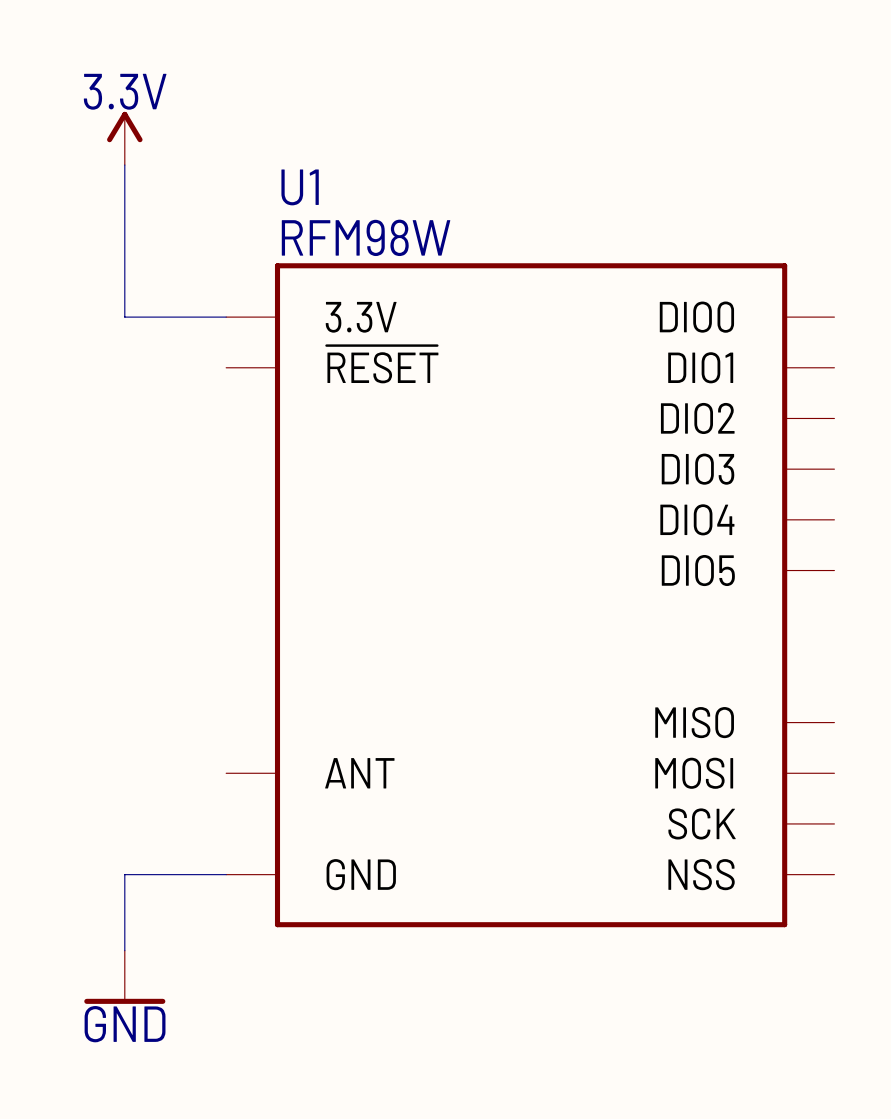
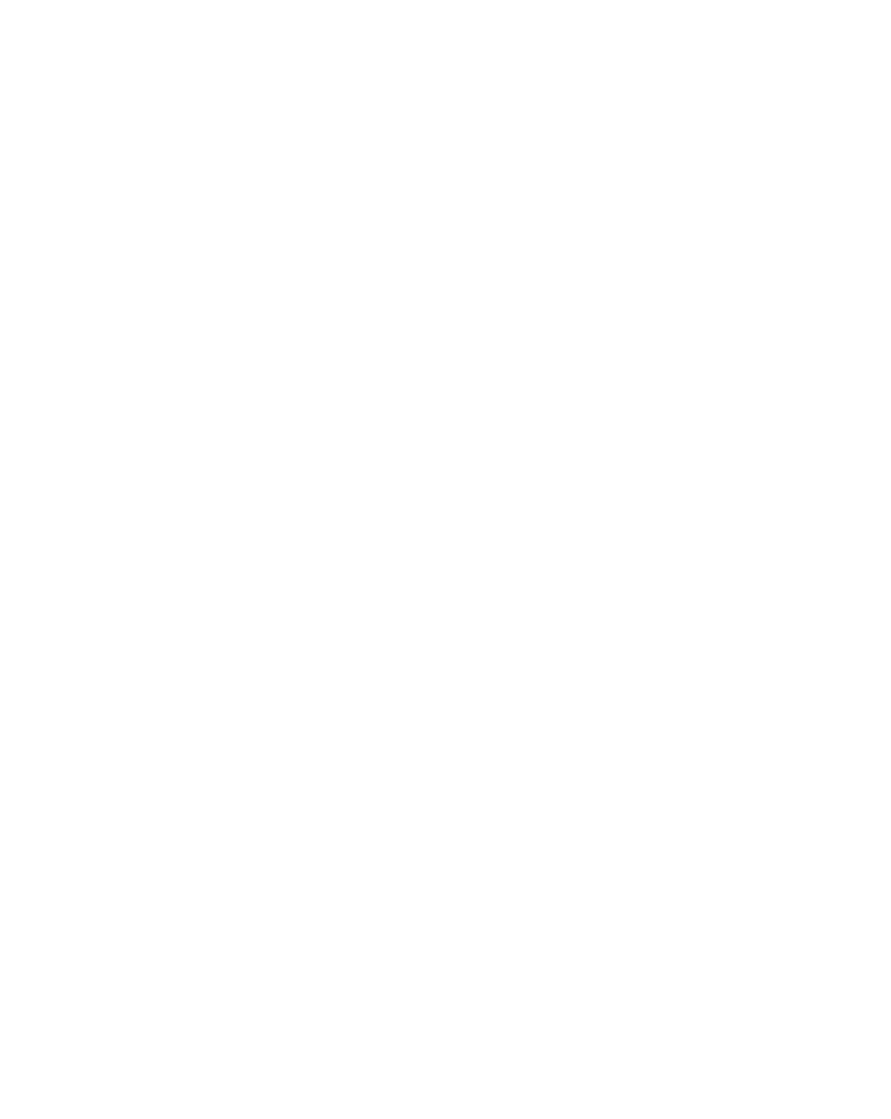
power symbol: 3.3V (124, 138) -> none
wire: (124, 165) (124, 317) (226, 317) -> none
U1: RFM98W (530, 595) -> none
wire: (226, 874) (124, 874) (124, 950) -> none
power symbol: GND (124, 977) -> none

